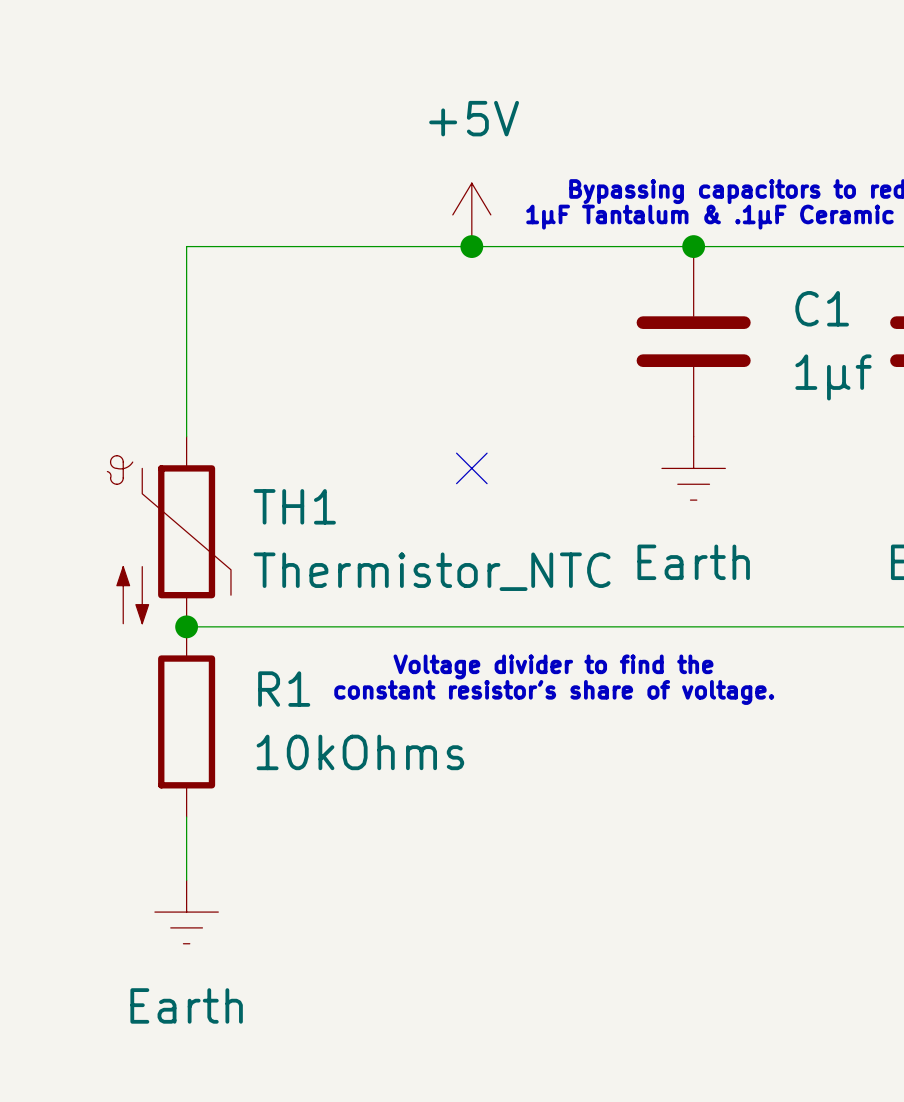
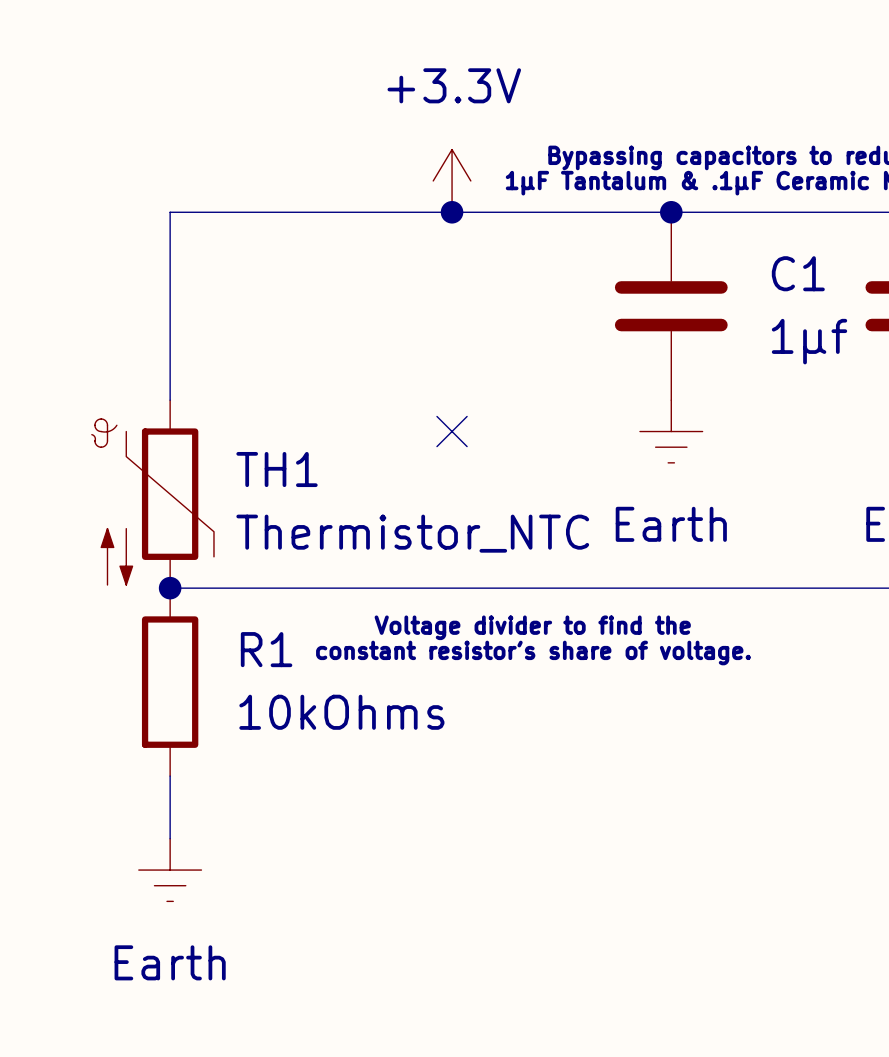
power symbol: +5V (471, 214) -> +3.3V (452, 180)

